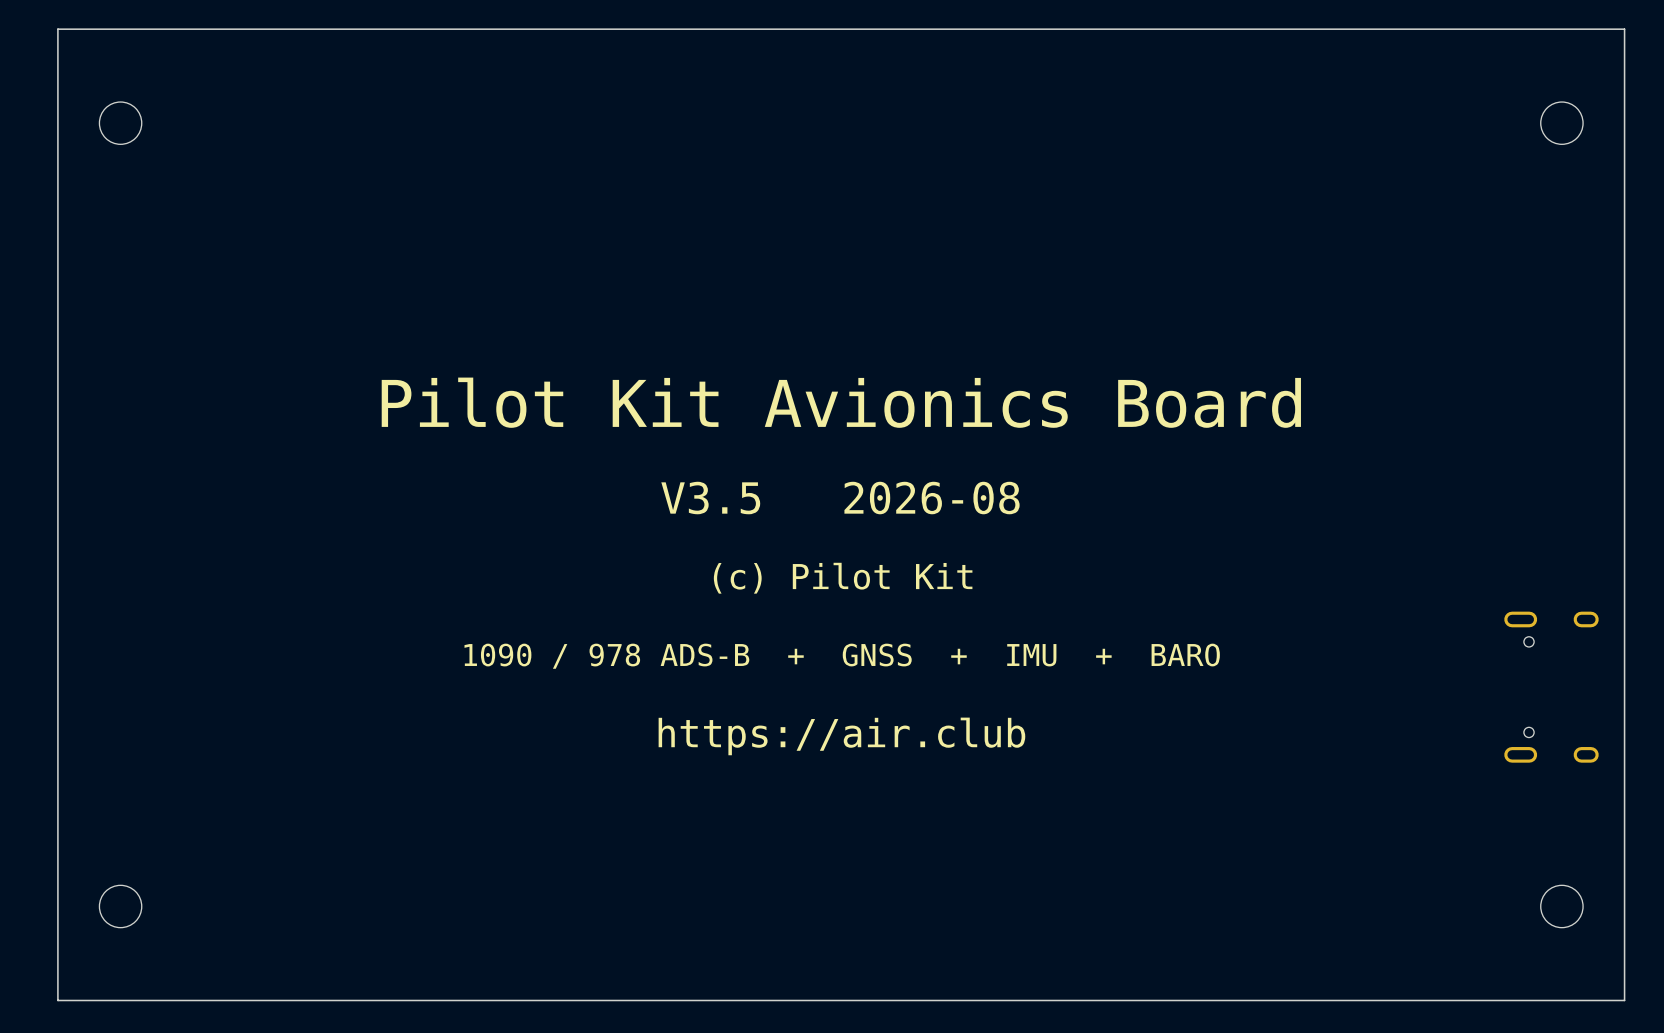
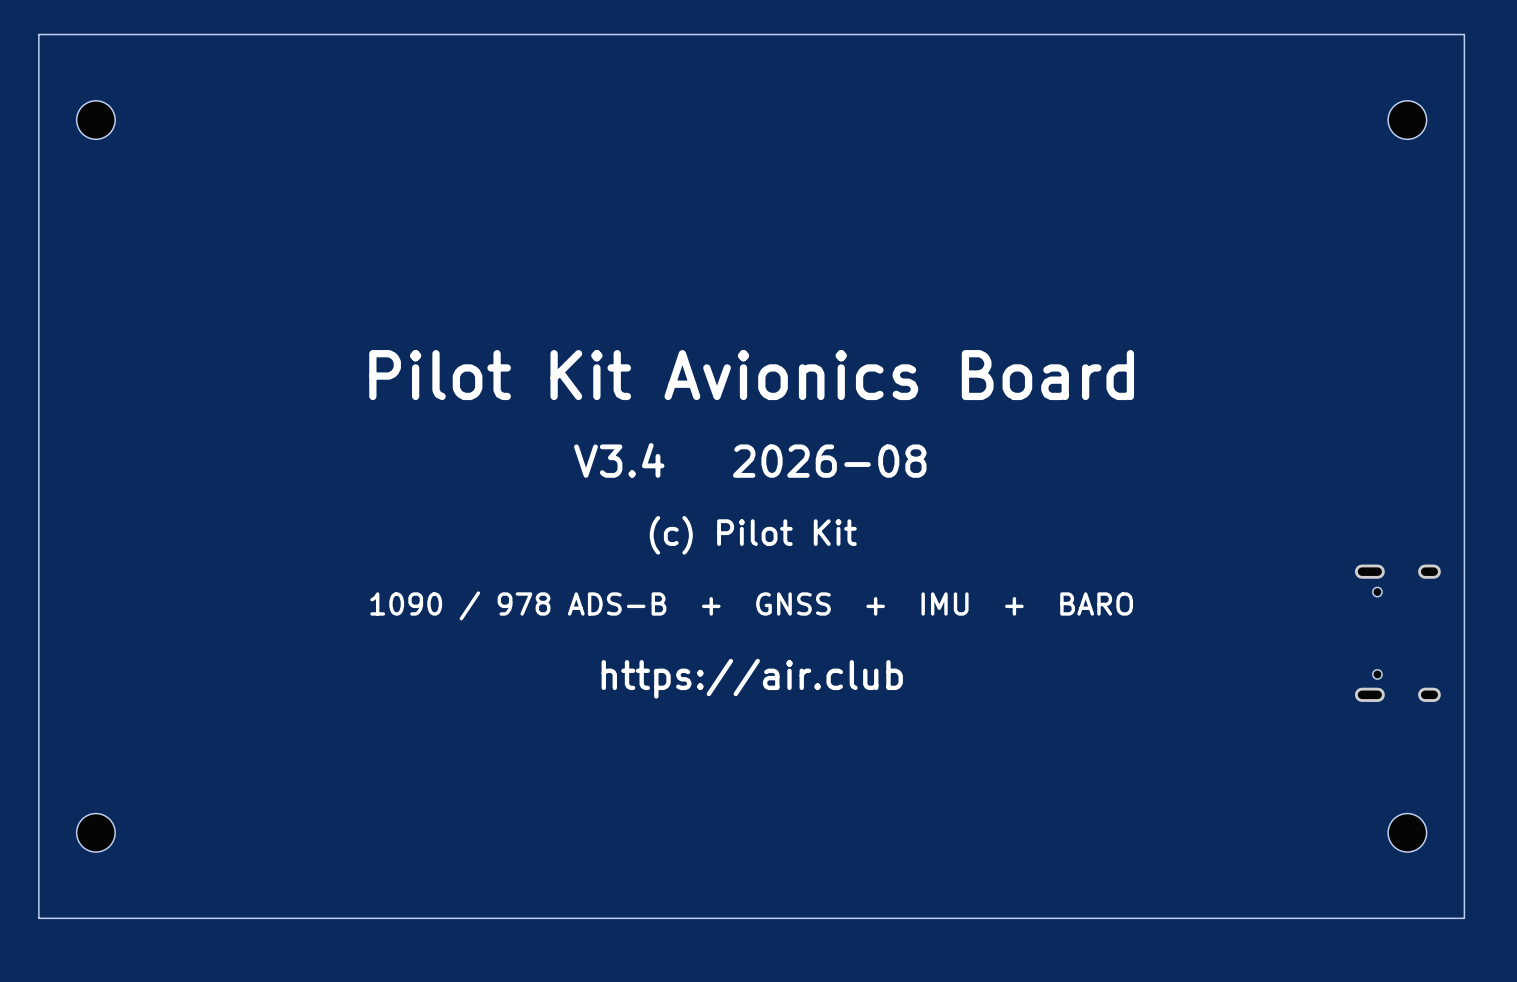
text: V3.5 2026-08 (840, 498) -> V3.4 2026-08 (750, 460)

